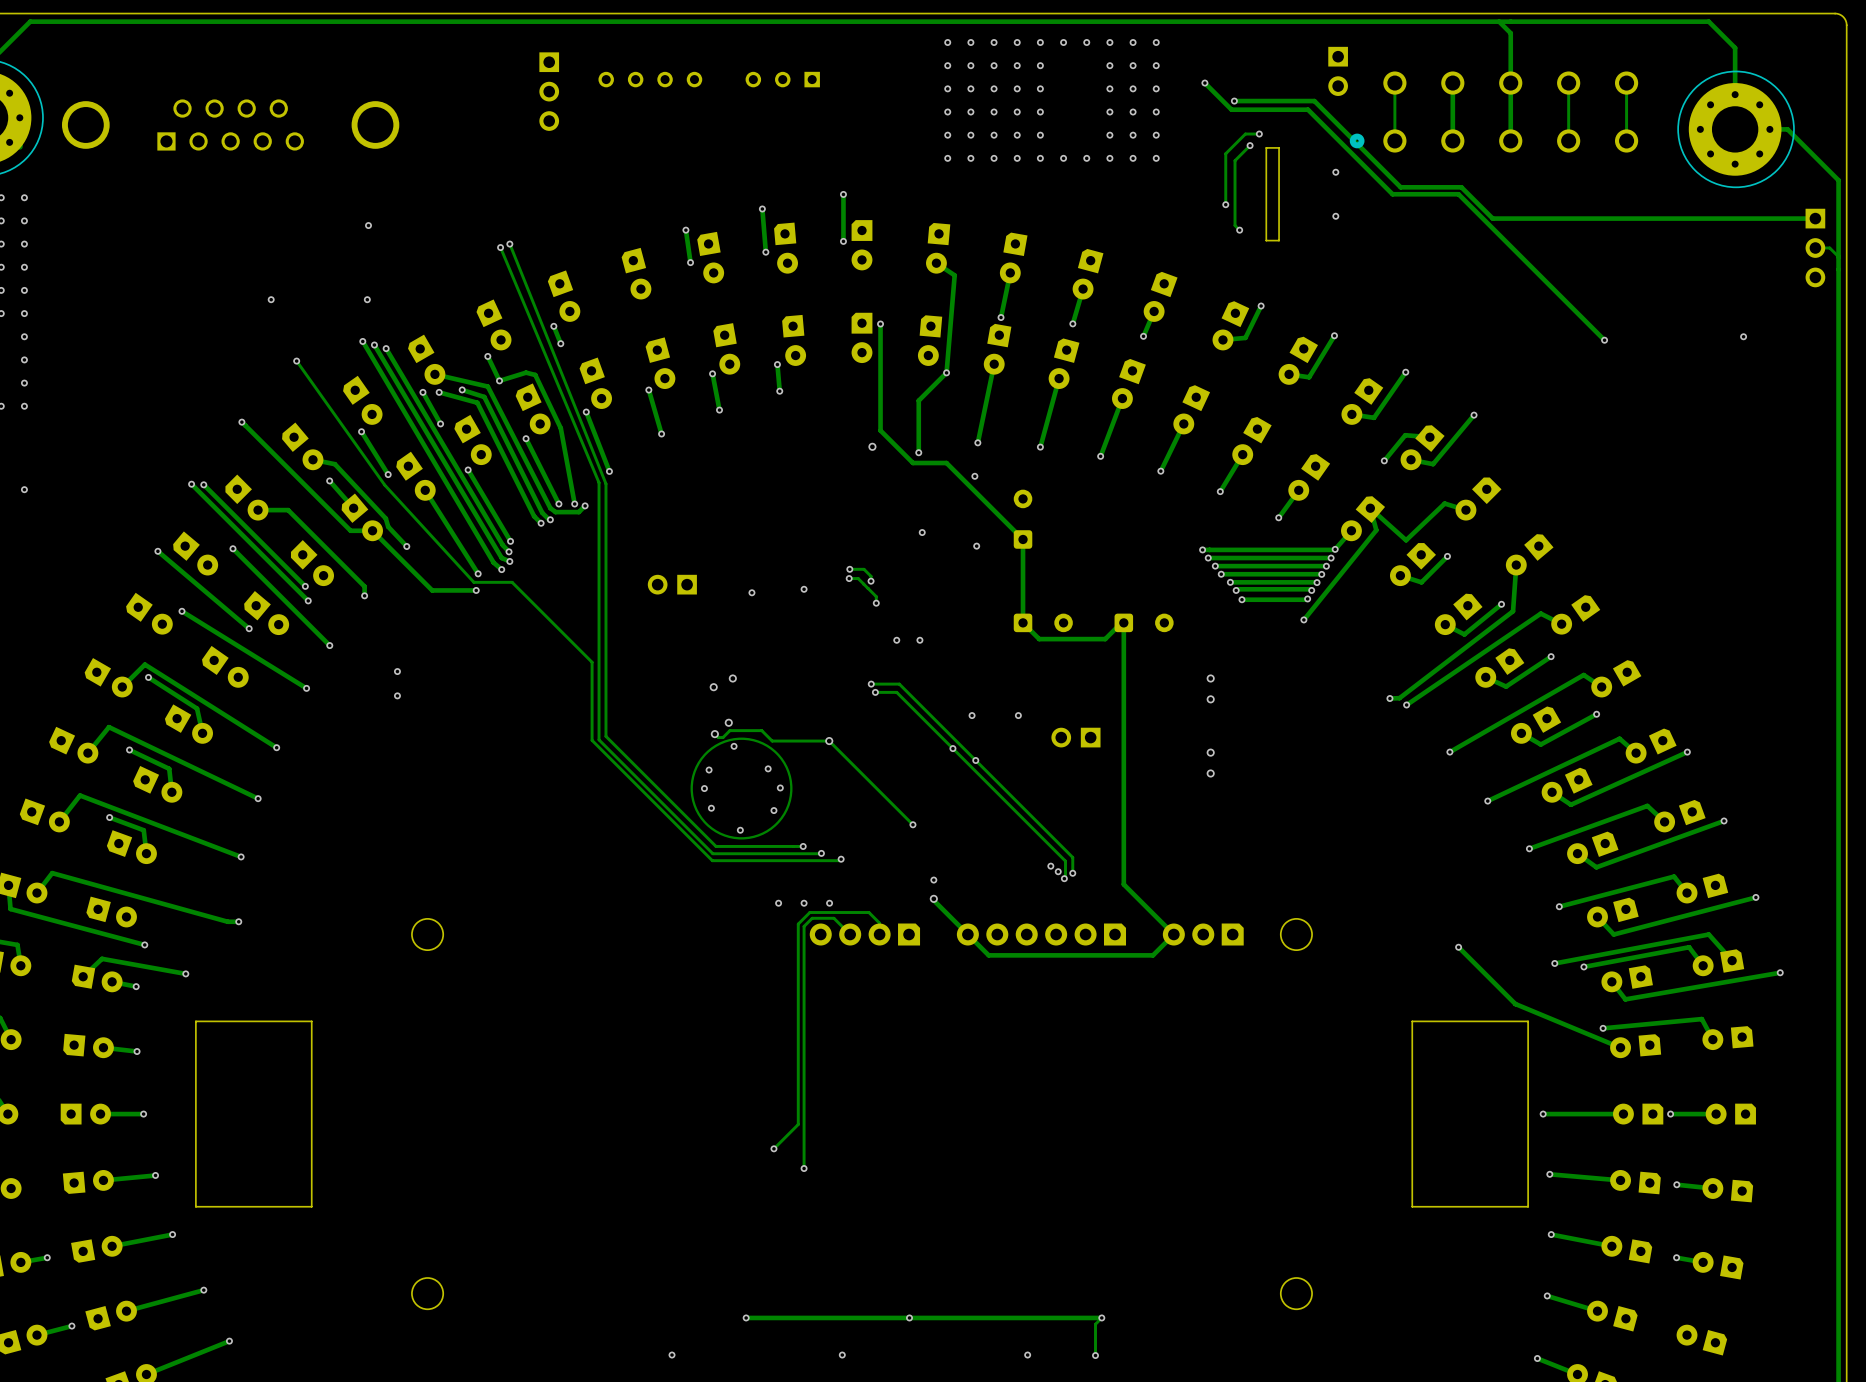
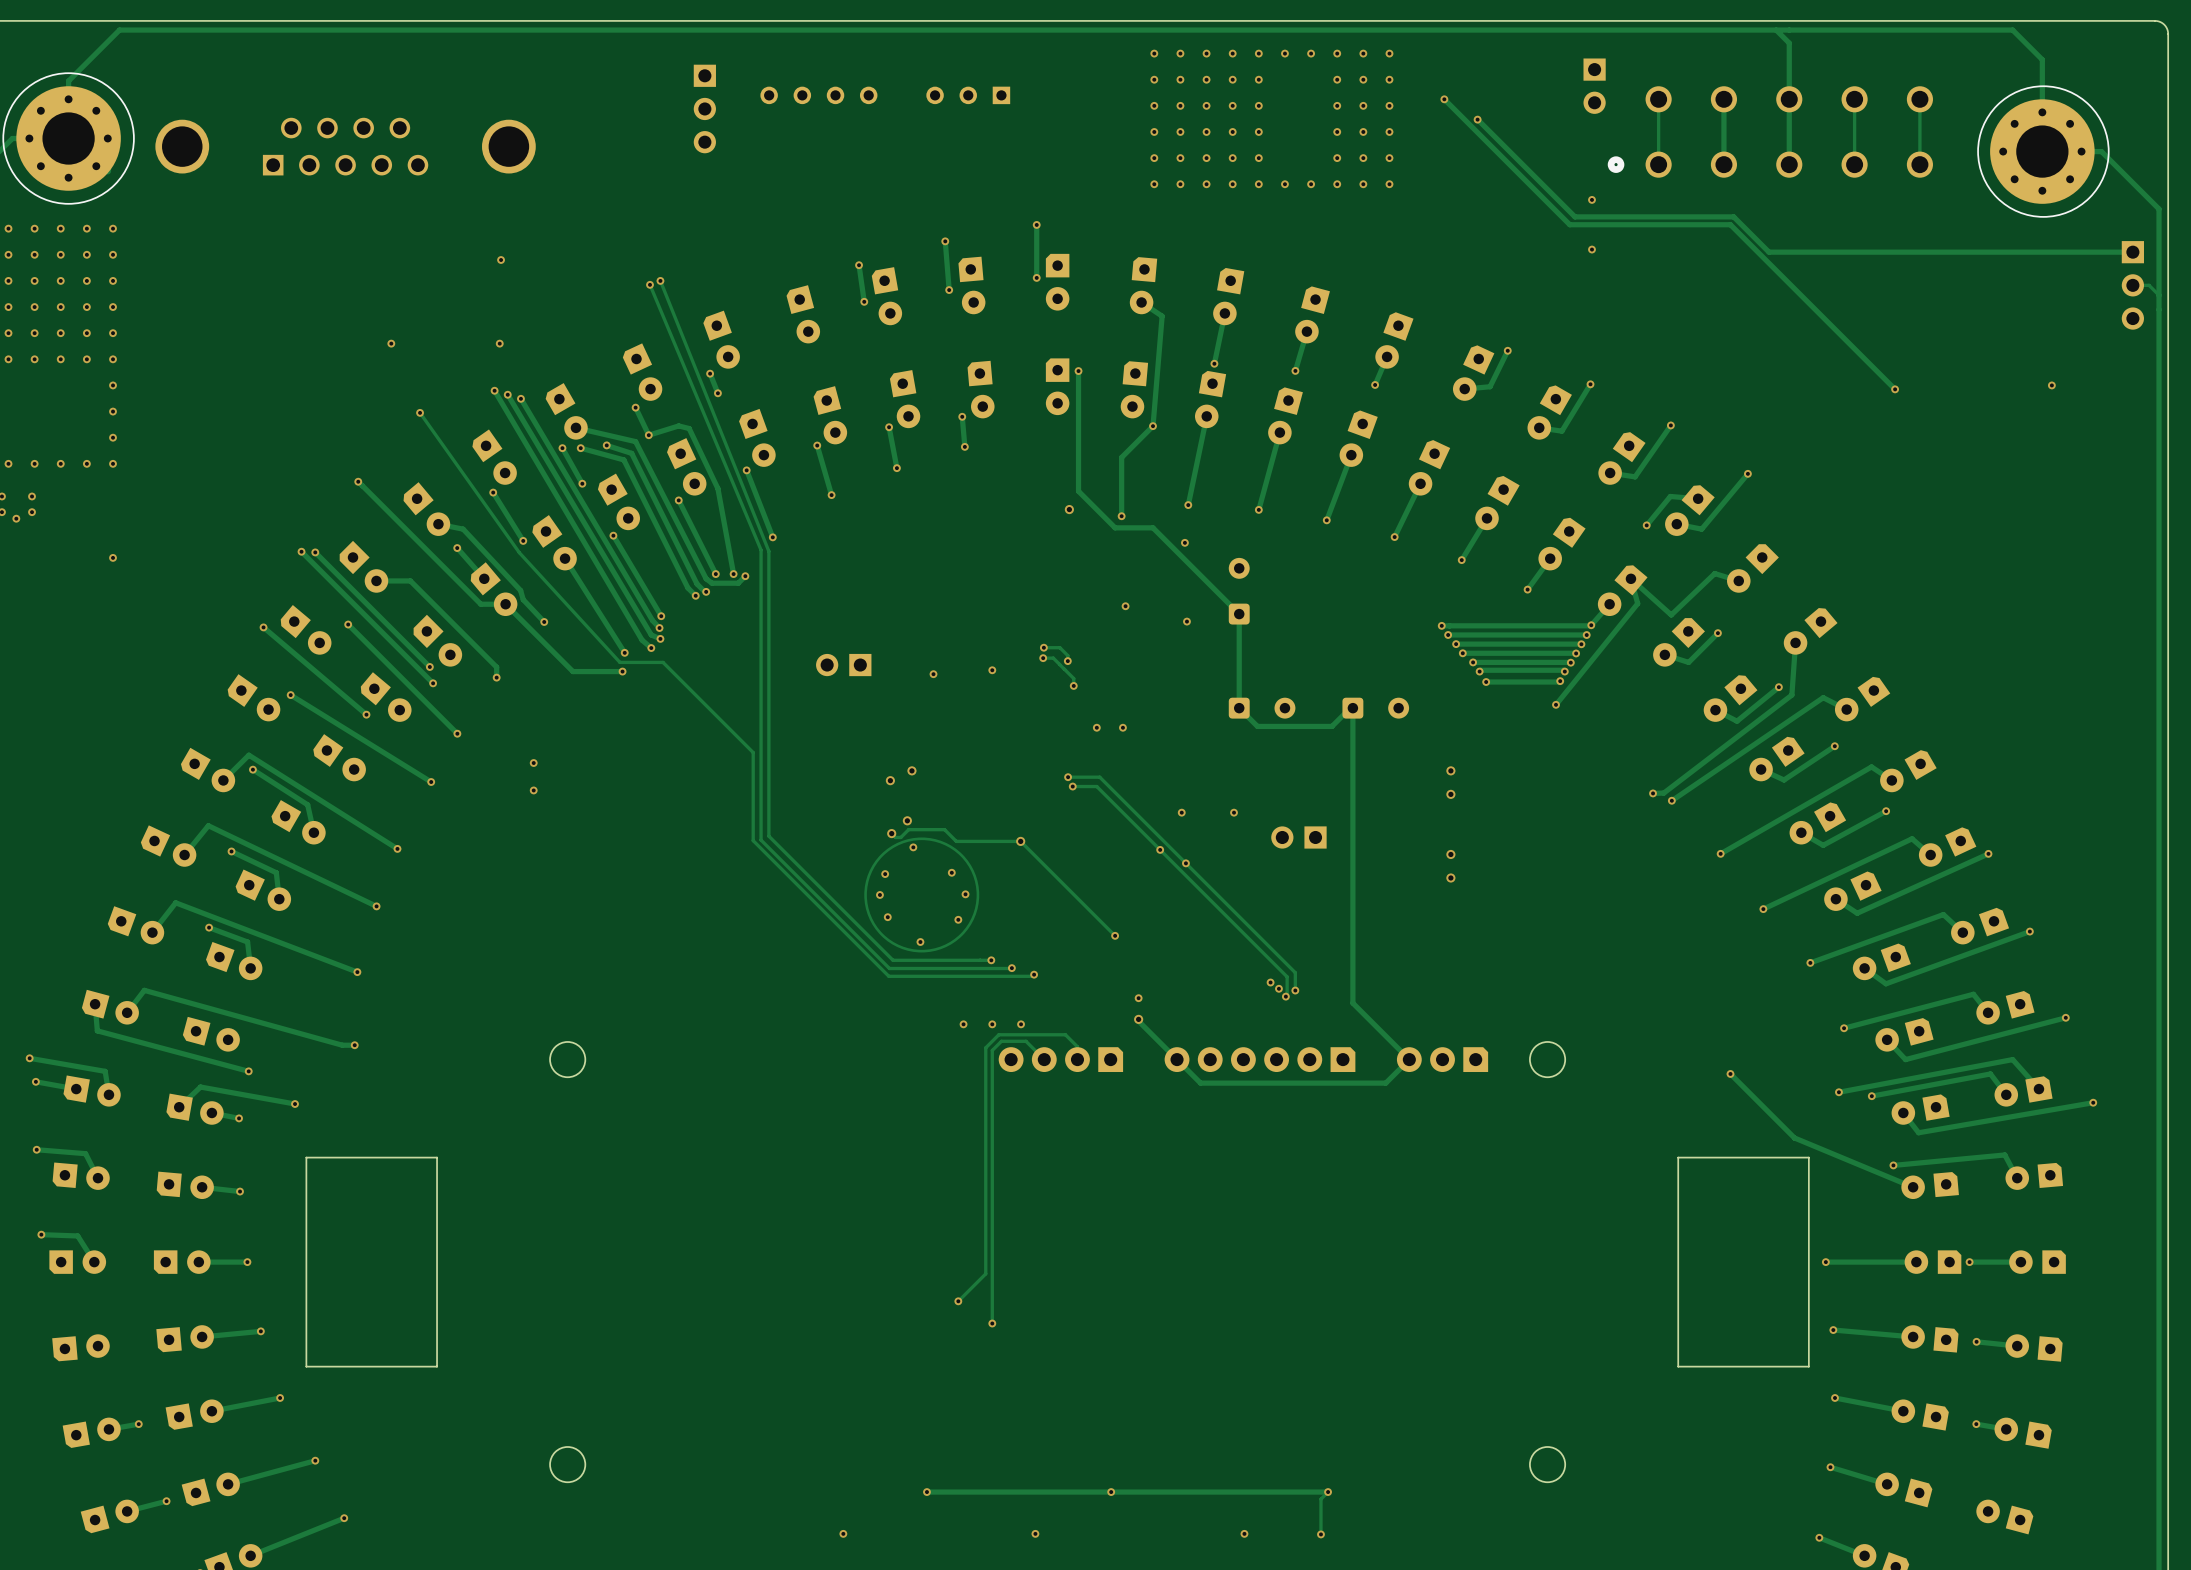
track: (1234, 101) (1314, 101) (1400, 187) -> (1477, 119) (1575, 216) (1665, 216)
track: (1231, 109) (1308, 109) (1392, 194) -> (1474, 129) (1569, 224) (1656, 224)
track: (1259, 134) (1245, 134) (1225, 153) (1225, 204) -> none
via: (1259, 134) -> none
track: (1250, 145) (1235, 160) (1235, 225) (1239, 230) -> none
via: (1250, 145) -> none
board edge: (1279, 147) (1266, 147) (1266, 240) (1279, 240) (1279, 147) -> none
via: (1225, 204) -> none
via: (1239, 230) -> none

